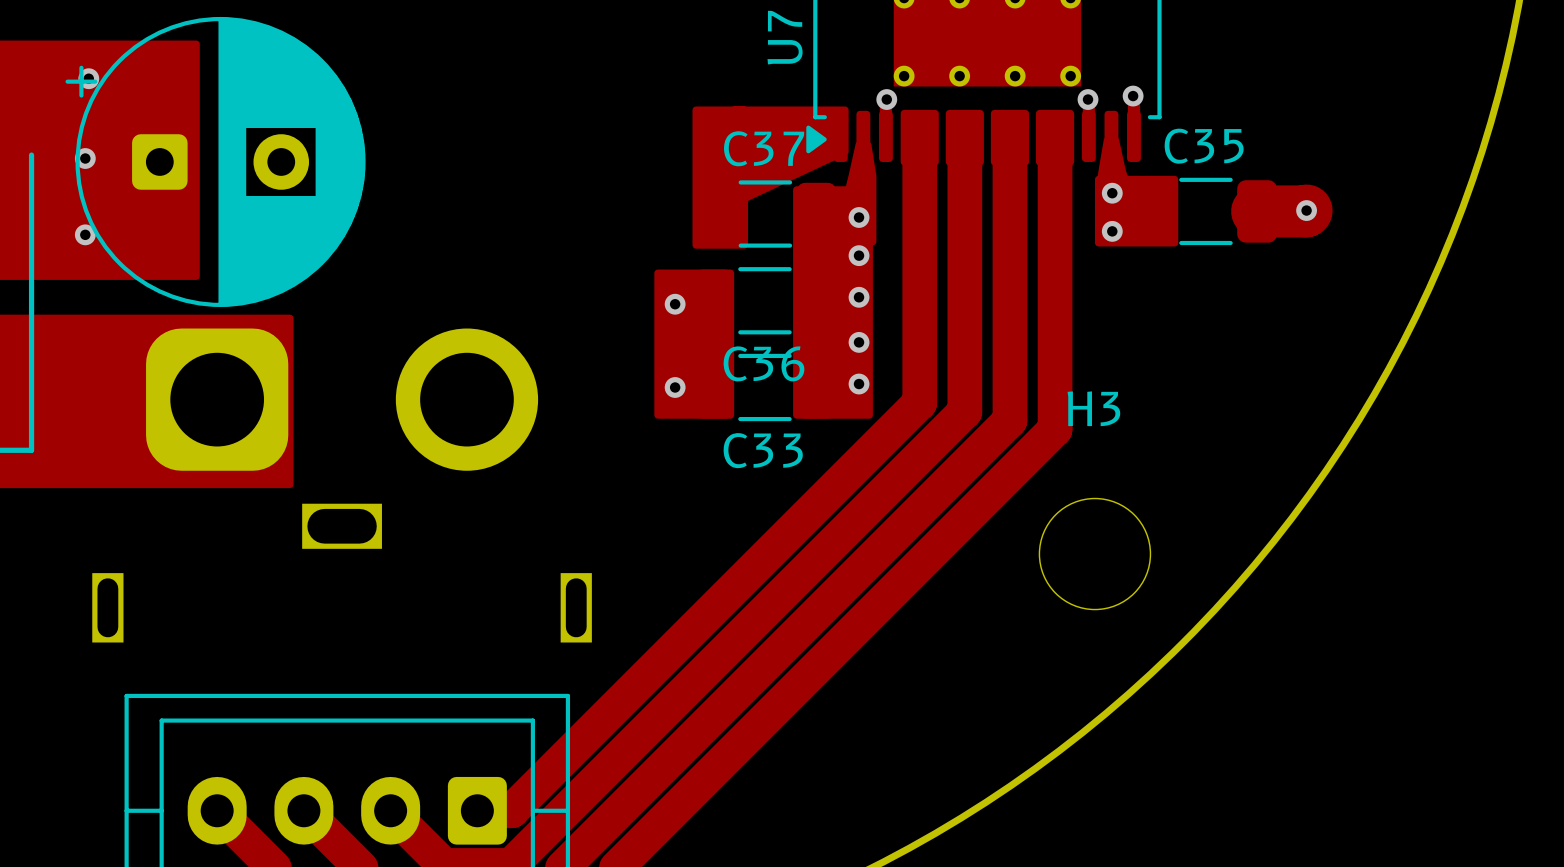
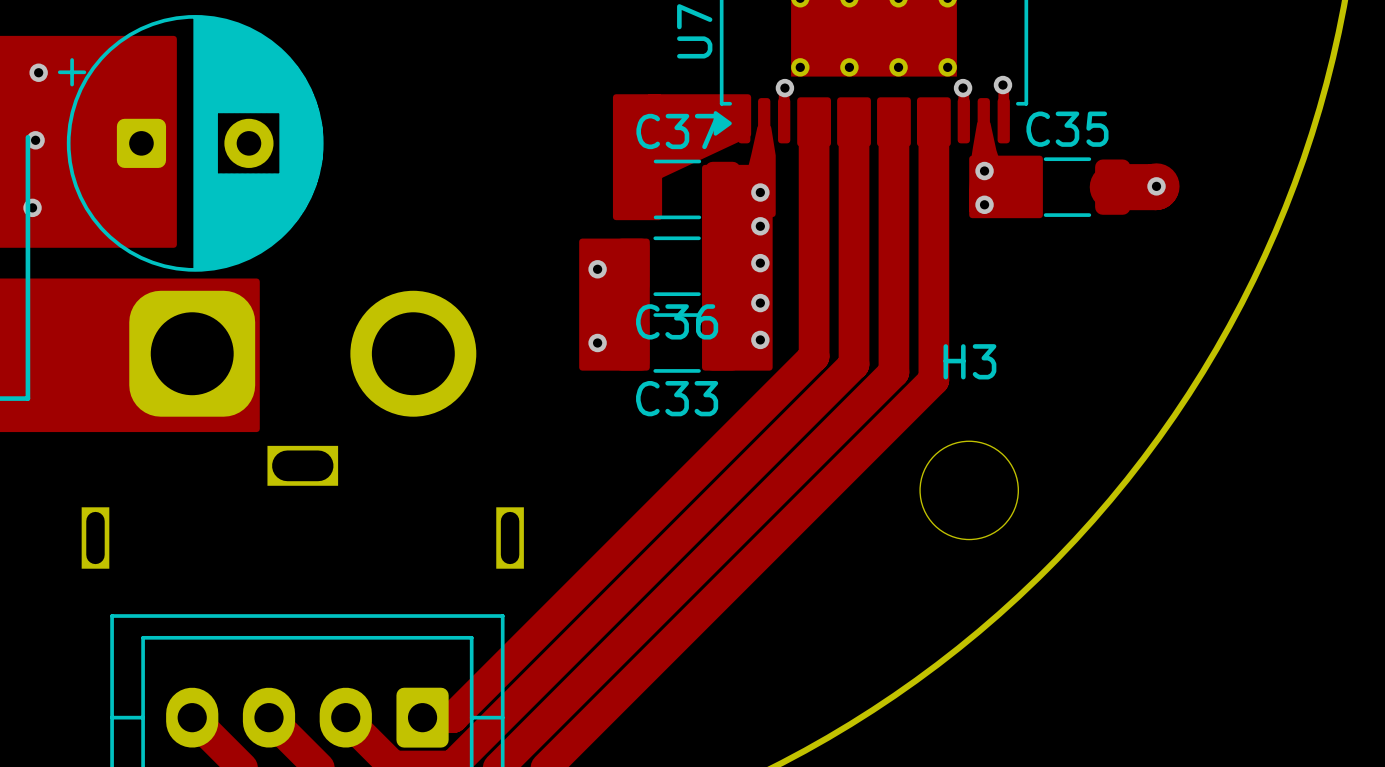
via: (88, 78) -> none
via: none -> (38, 72)
via: none -> (35, 140)
via: (85, 158) -> none
via: none -> (32, 207)
via: (85, 234) -> none

